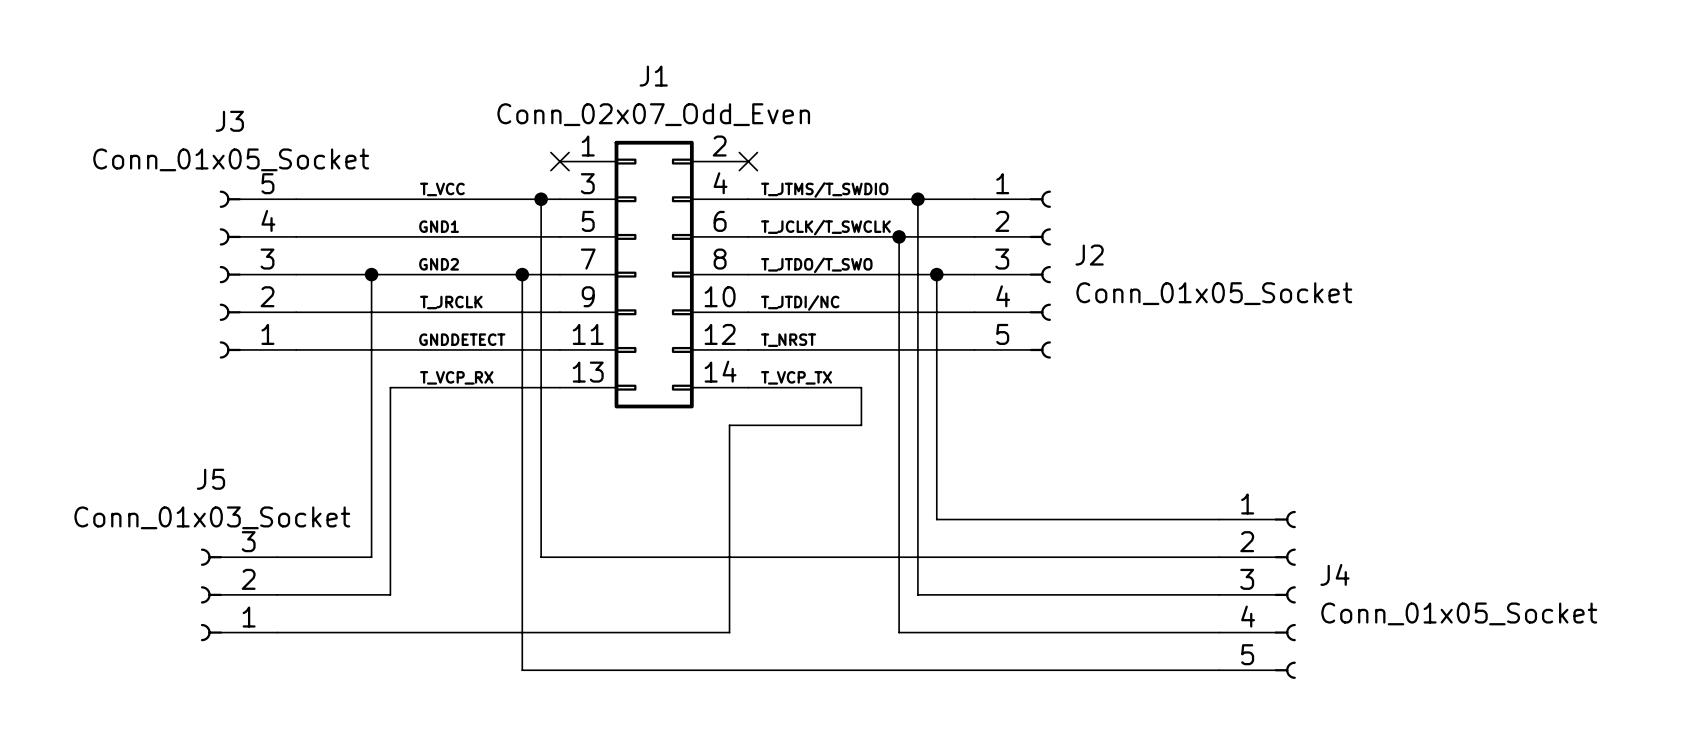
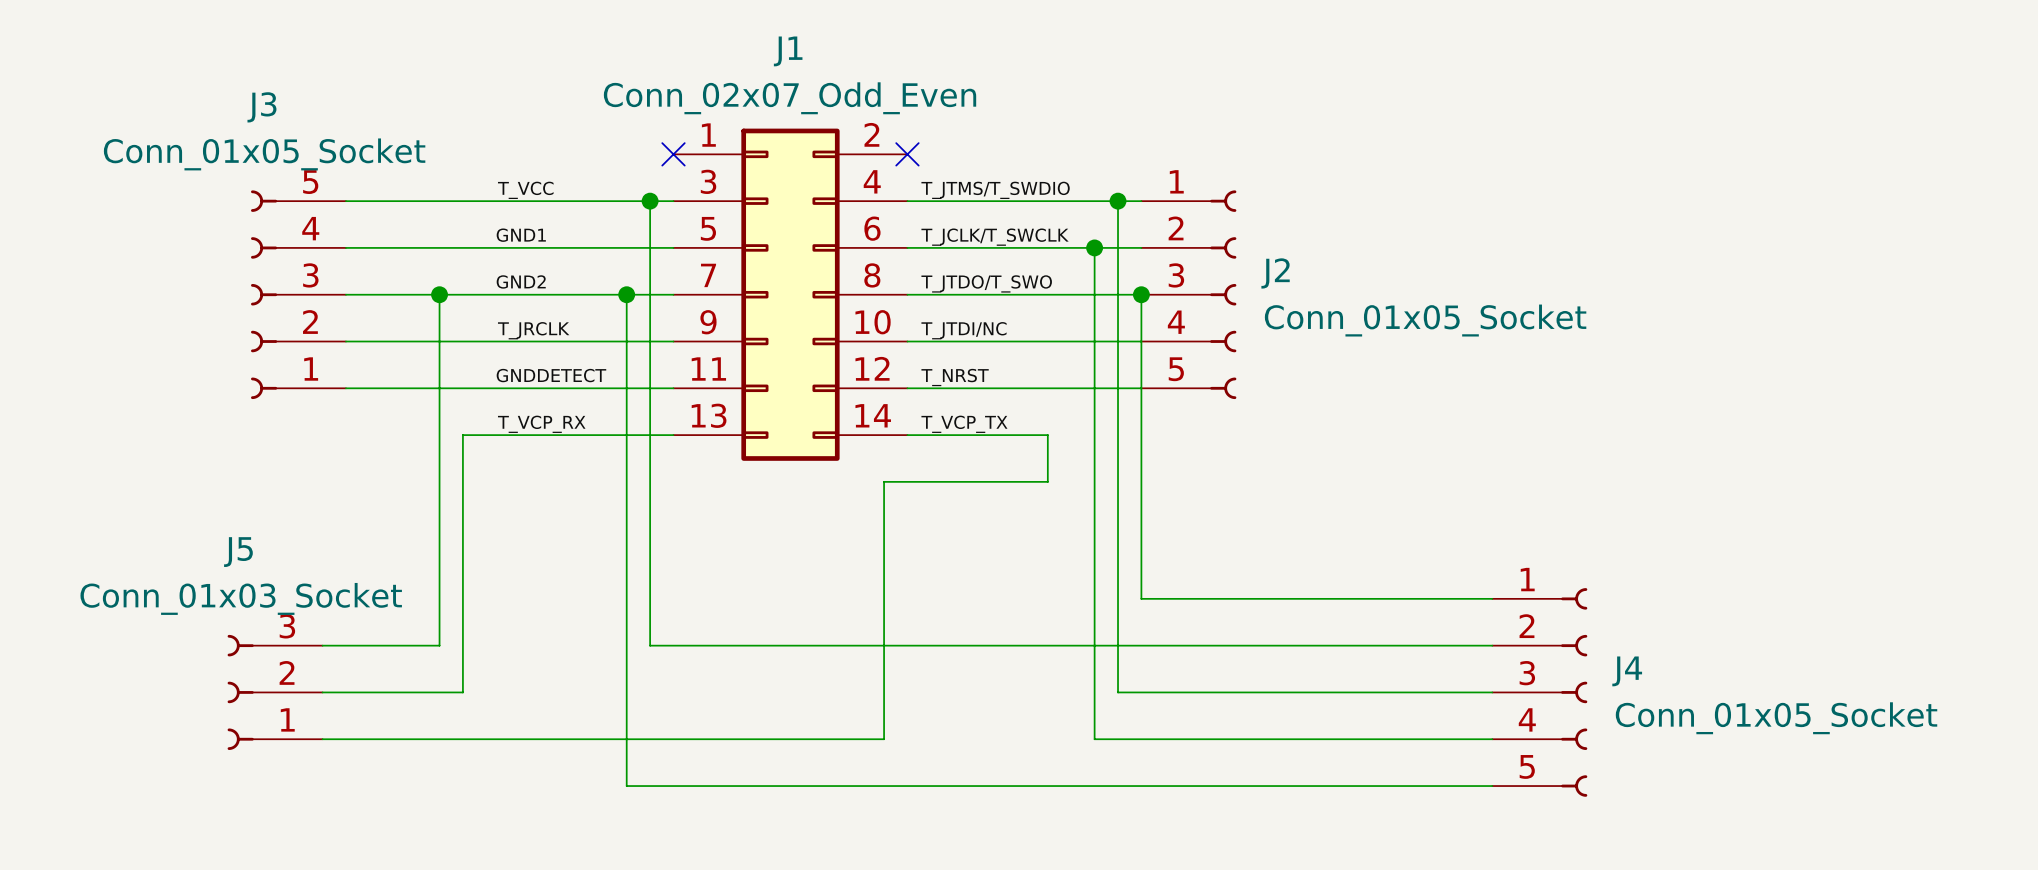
J2 position: (1012, 274) -> (1188, 294)

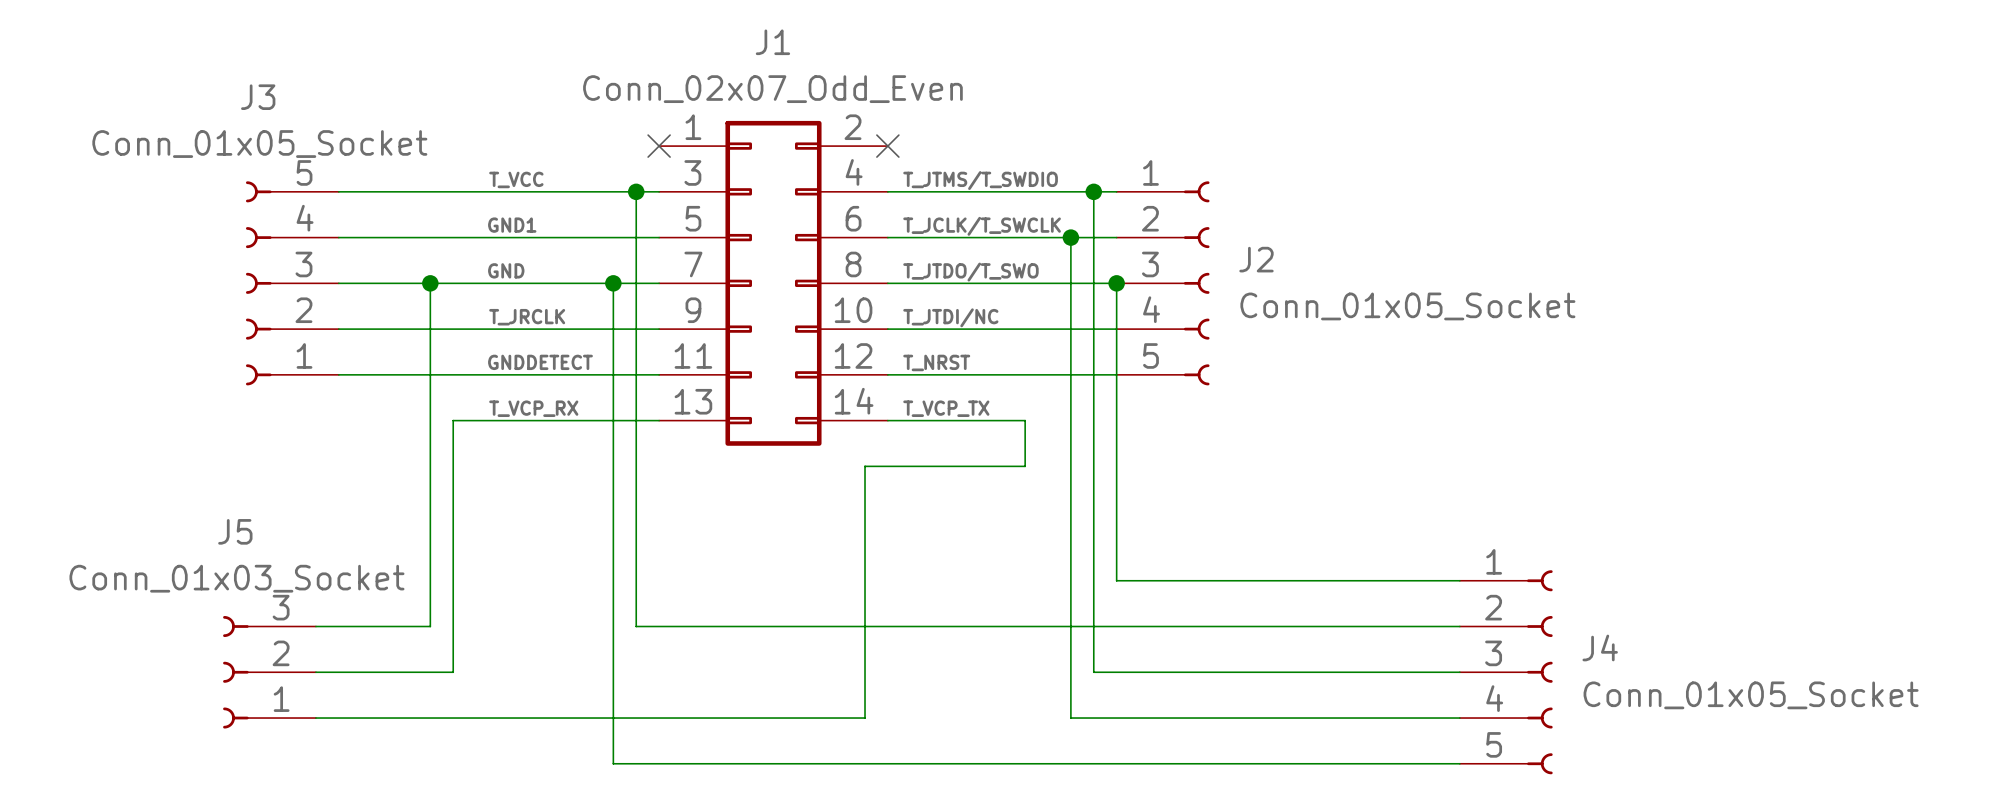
label: GND2 (521, 281) -> GND (506, 270)

